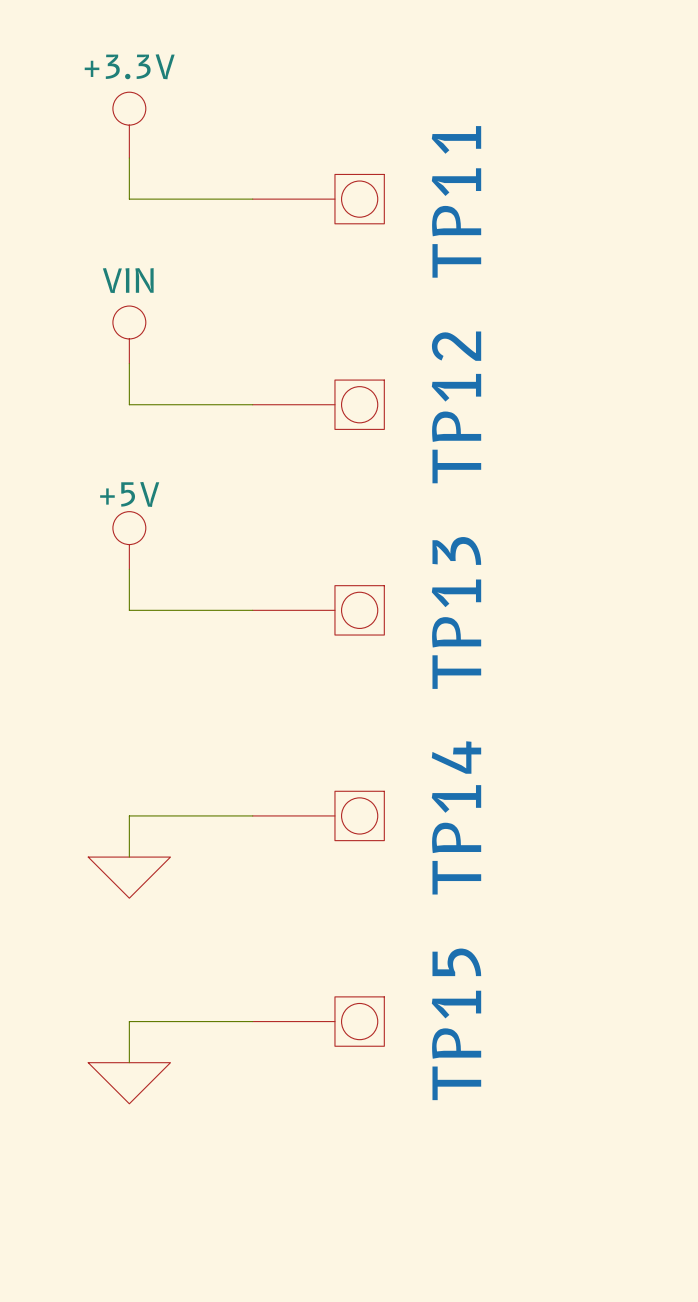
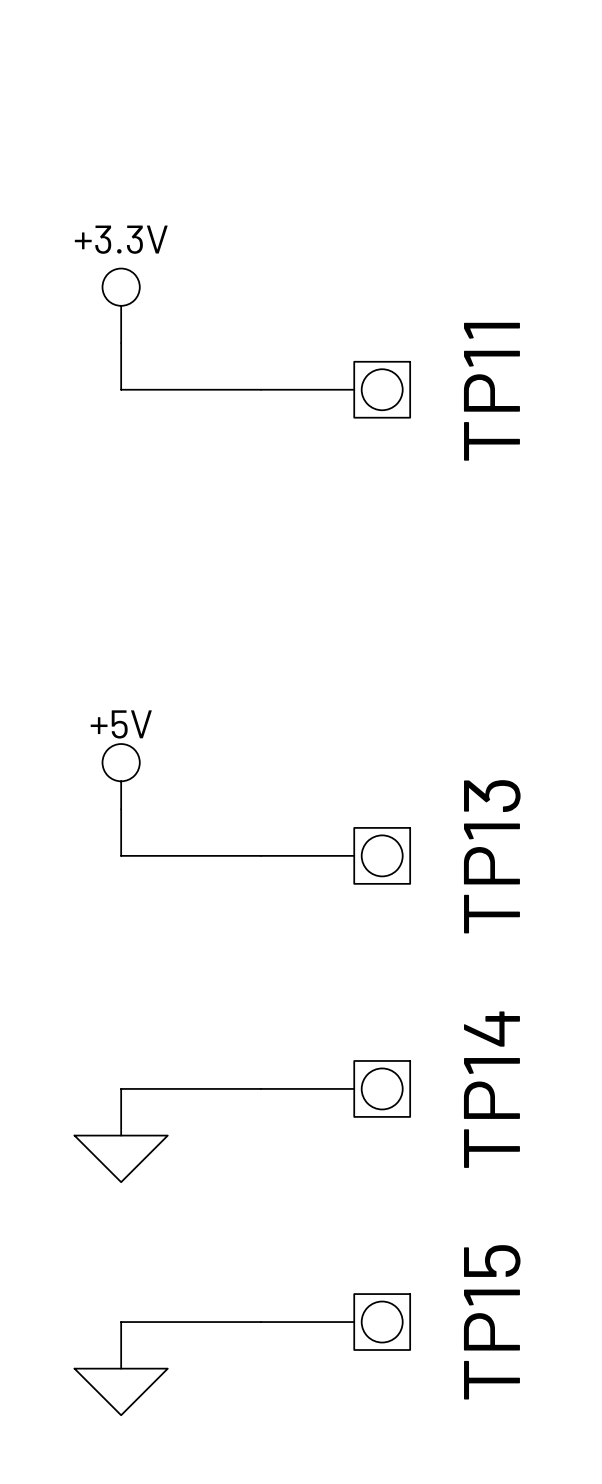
power symbol: VIN (129, 334) -> none
wire: (129, 363) (129, 404) (252, 404) -> none
TP12: (318, 404) -> none

